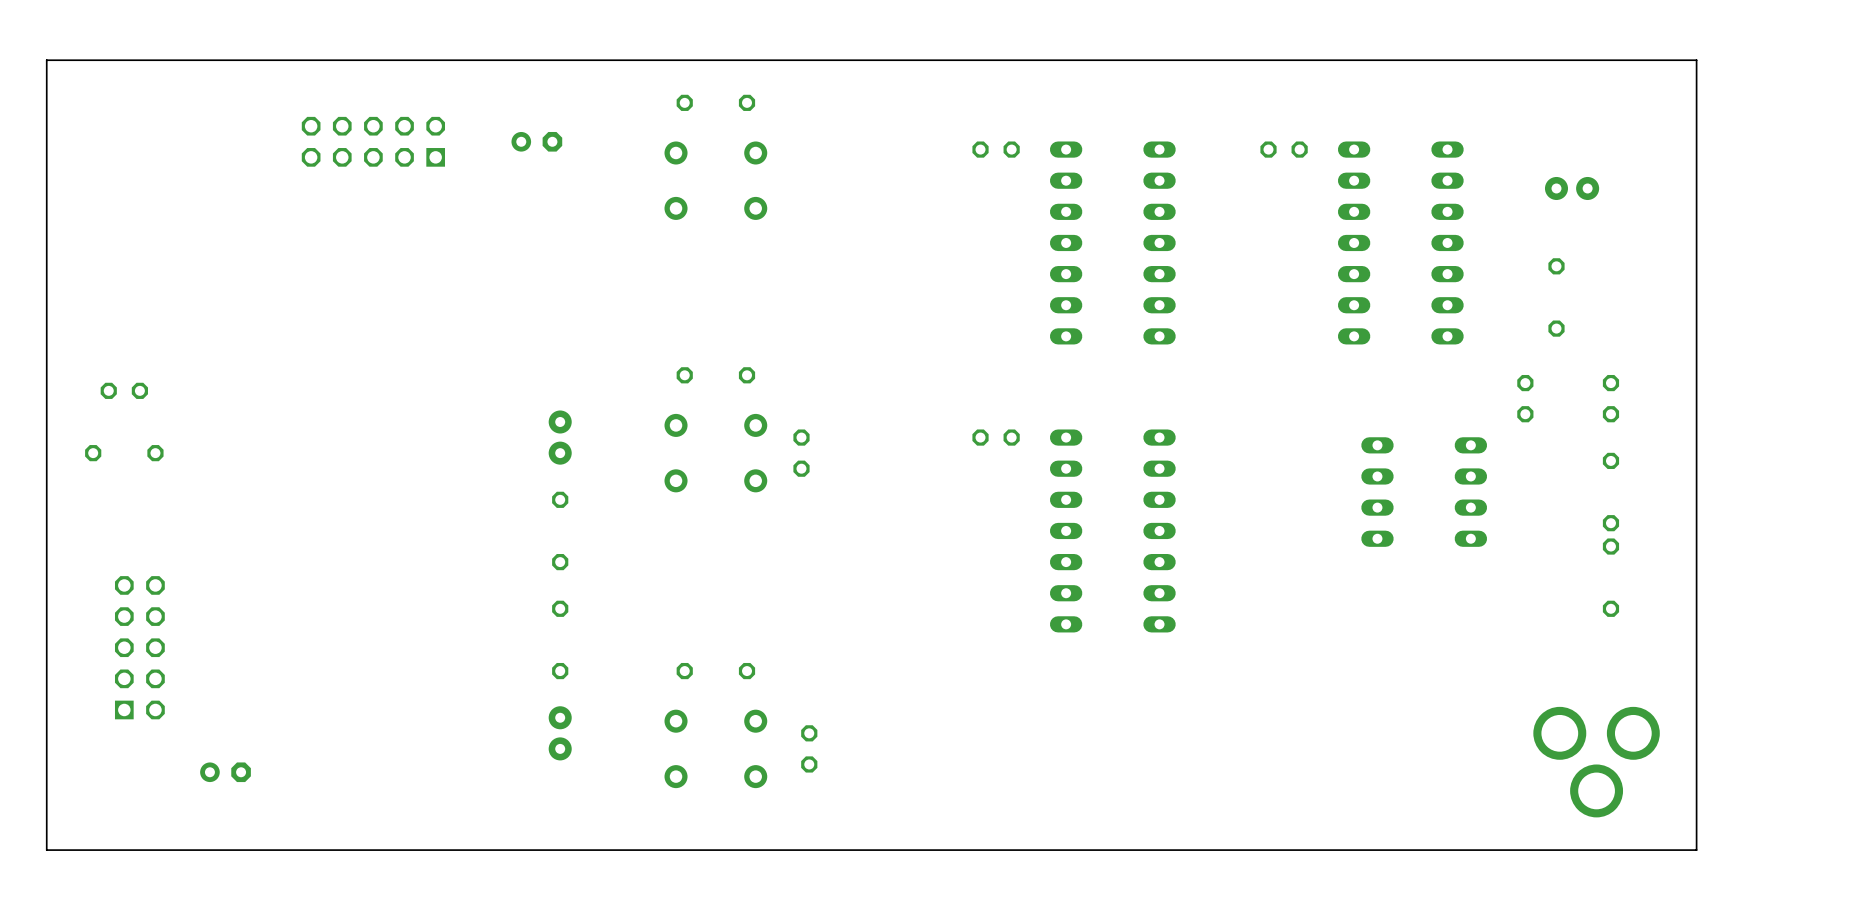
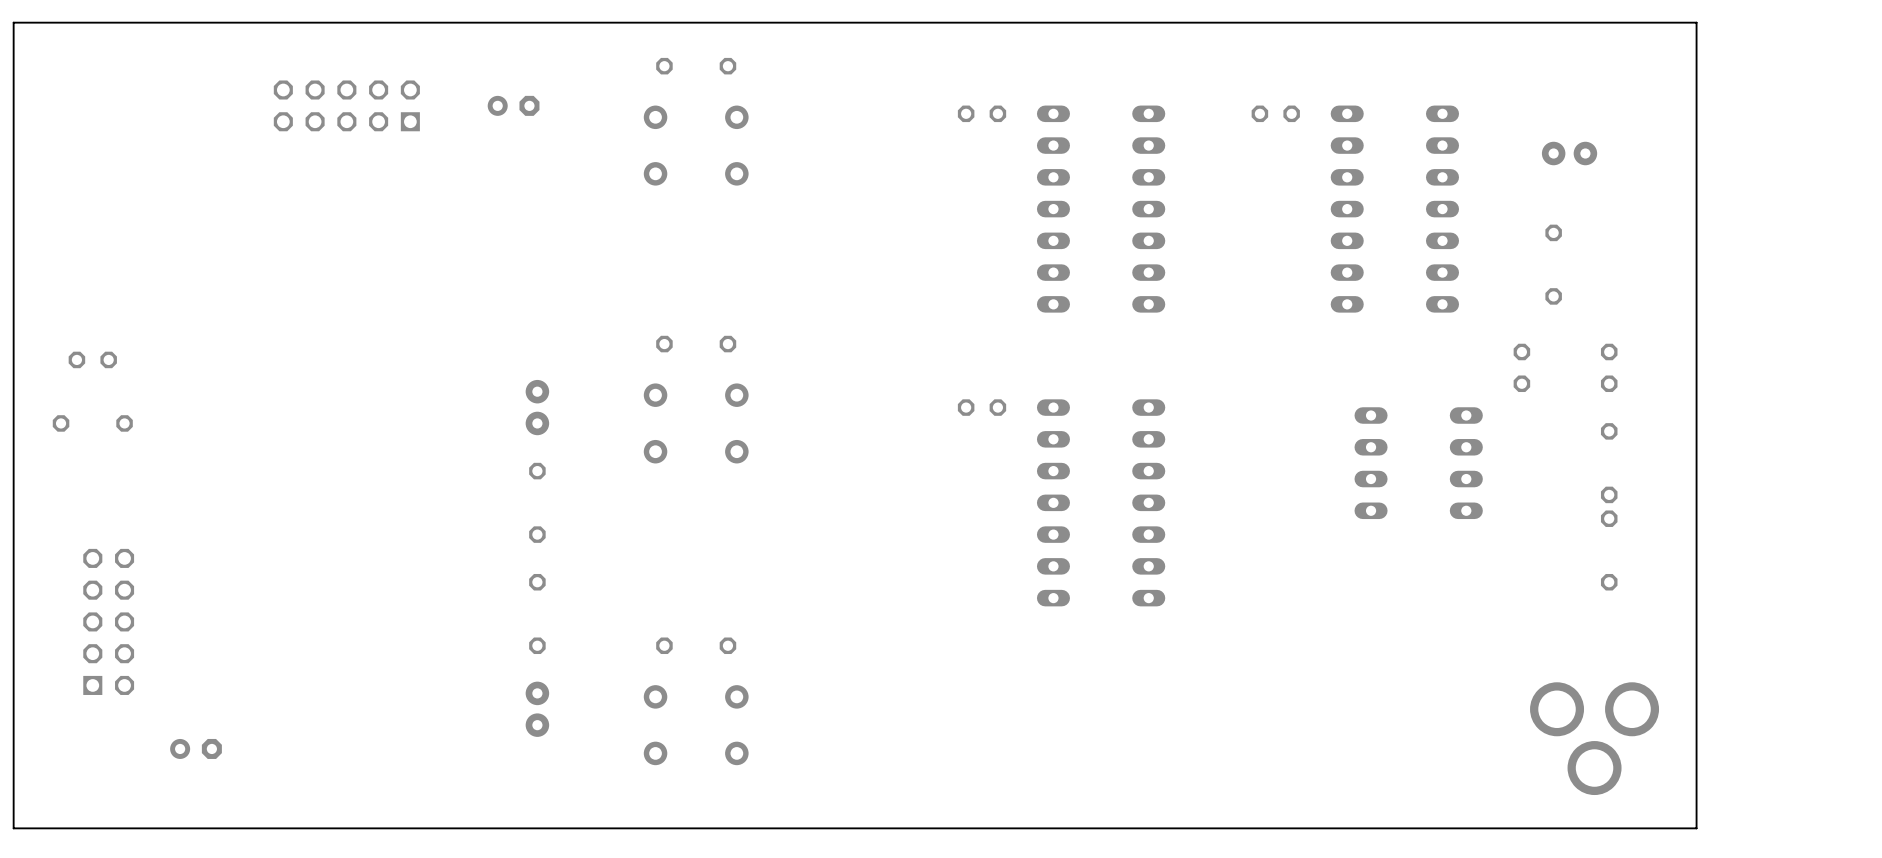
part: (801, 453) -> none
part: (809, 748) -> none

